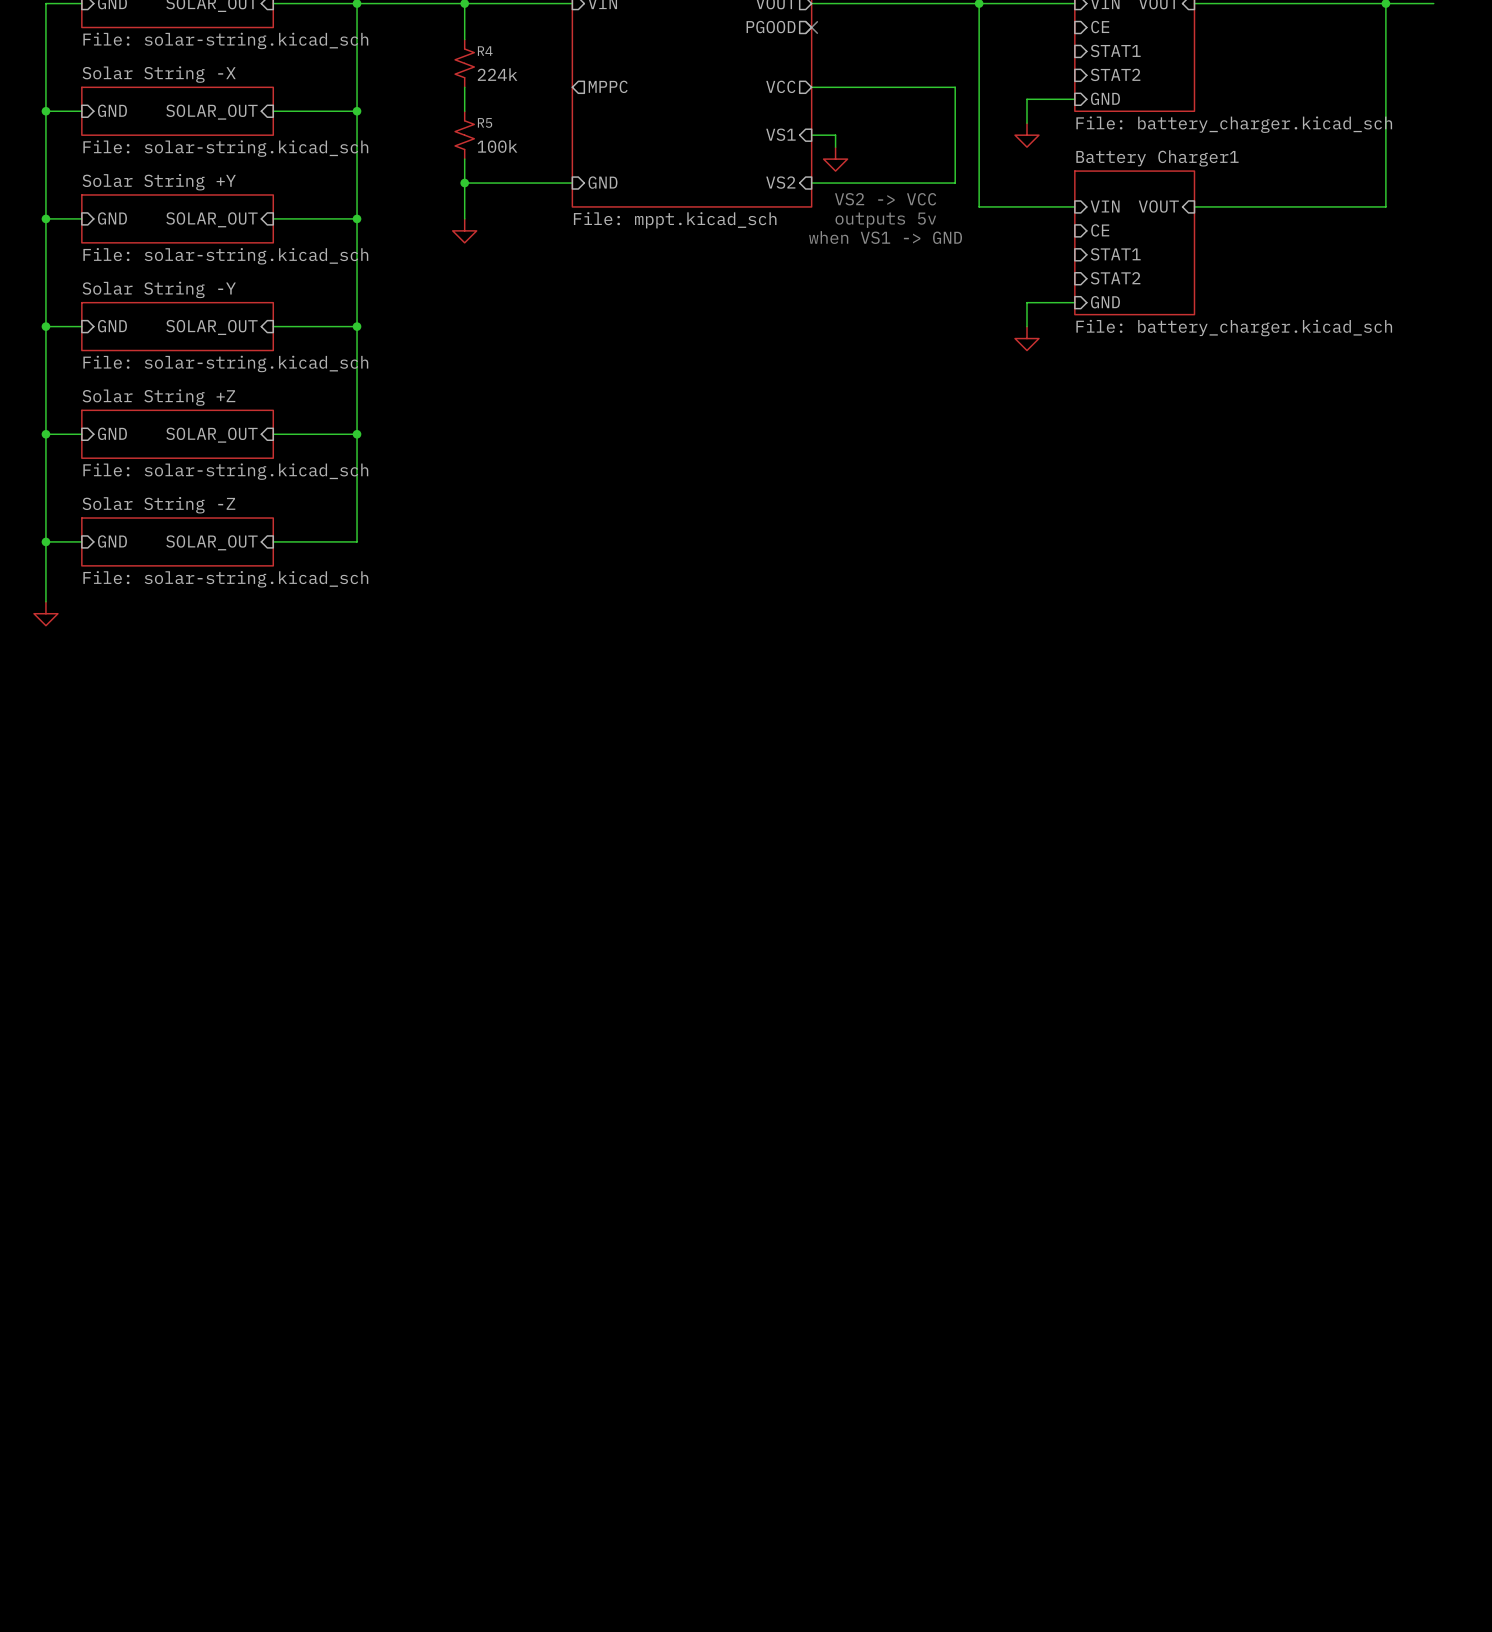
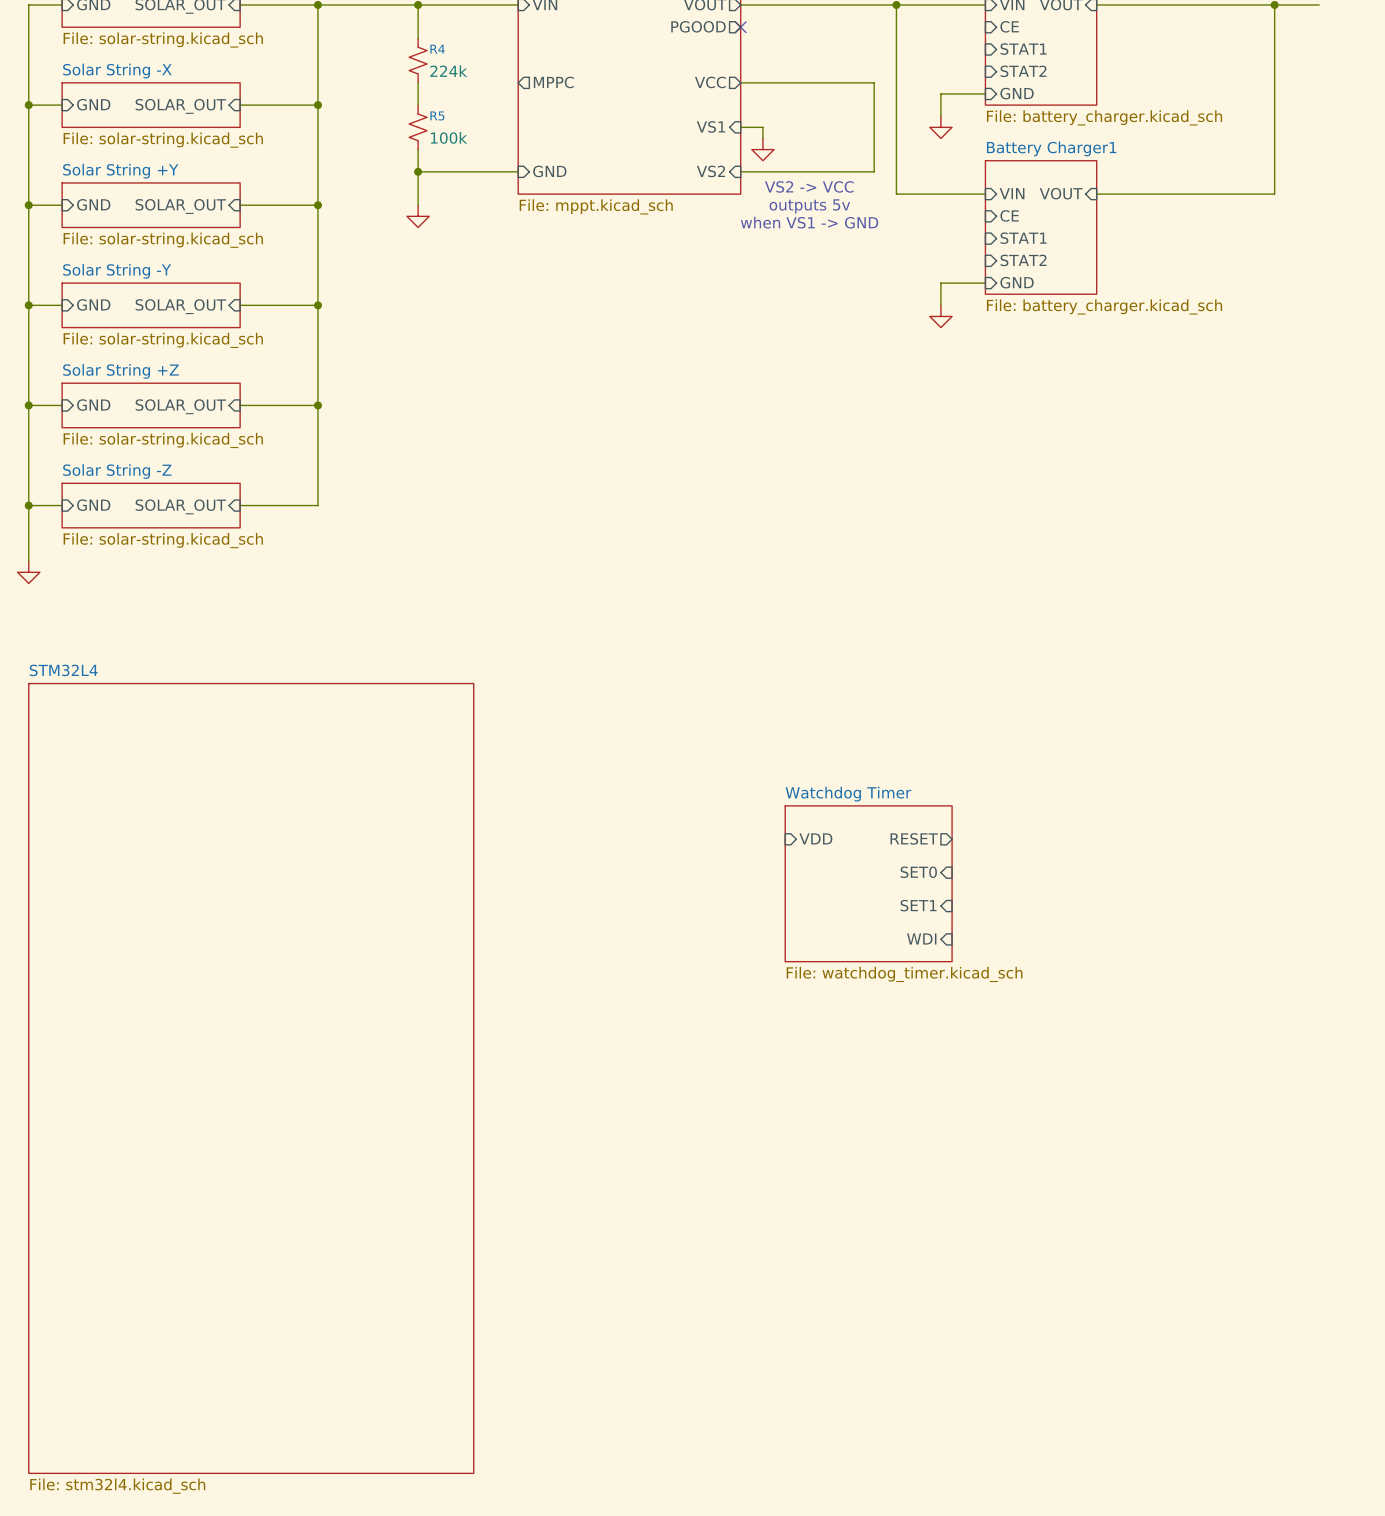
sheet pin: none -> VDD (815, 838)
sheet pin: none -> RESET (914, 838)
sheet pin: none -> SET0 (918, 872)
sheet Watchdog Timer: none -> File: watchdog_timer.kicad_sch (868, 883)
sheet pin: none -> SET1 (918, 905)
sheet pin: none -> WDI (921, 939)
sheet STM32L4: none -> File: stm32l4.kicad_sch (251, 1078)

